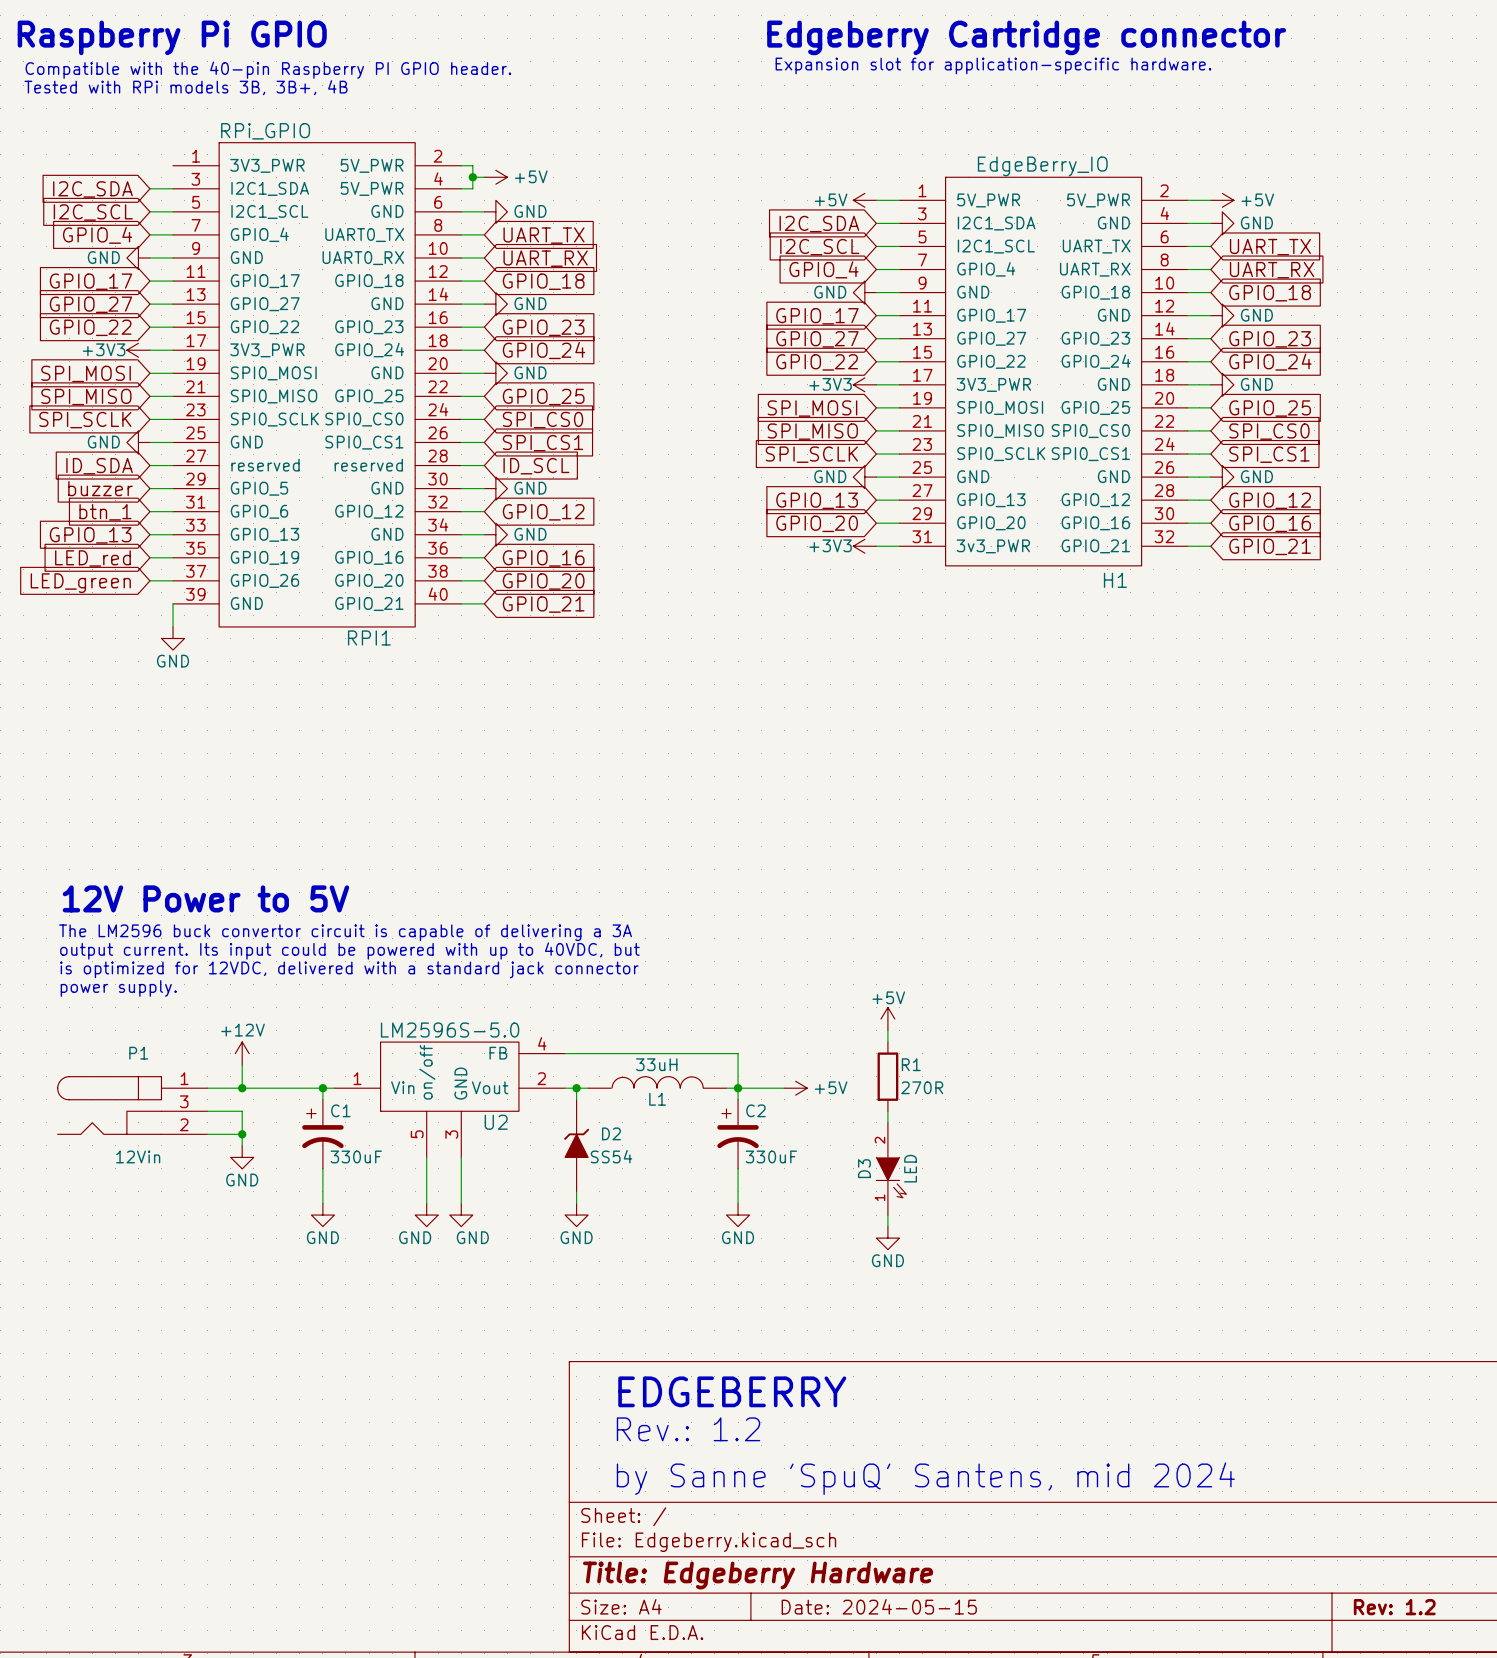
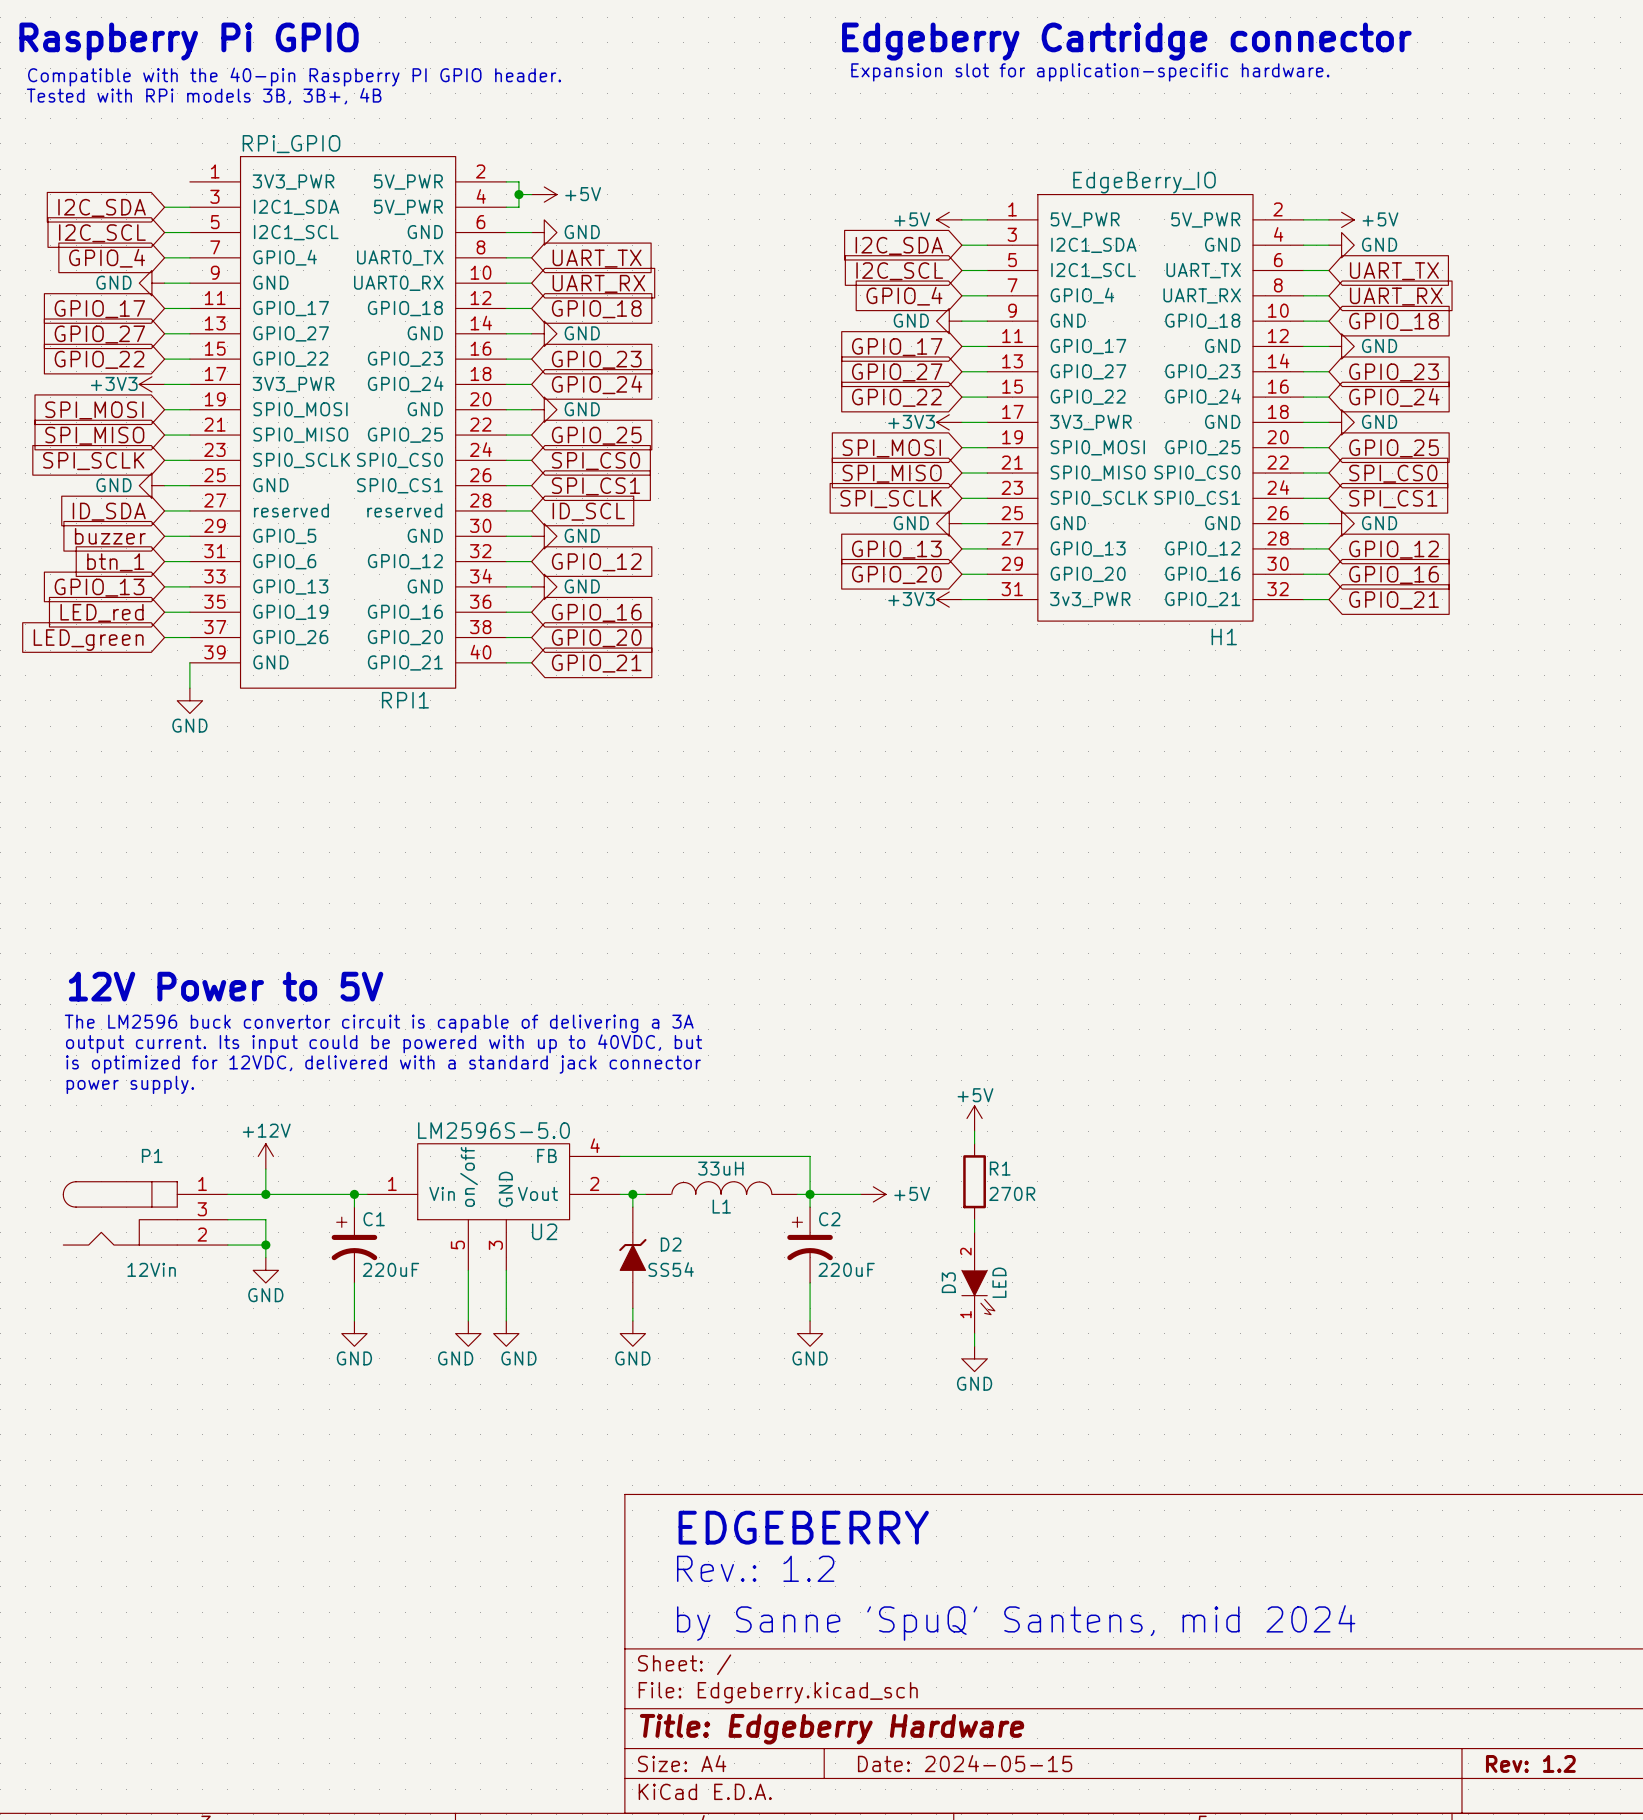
C1 value: 330uF (356, 1156) -> 220uF (390, 1269)
C2 value: 330uF (771, 1156) -> 220uF (846, 1269)

